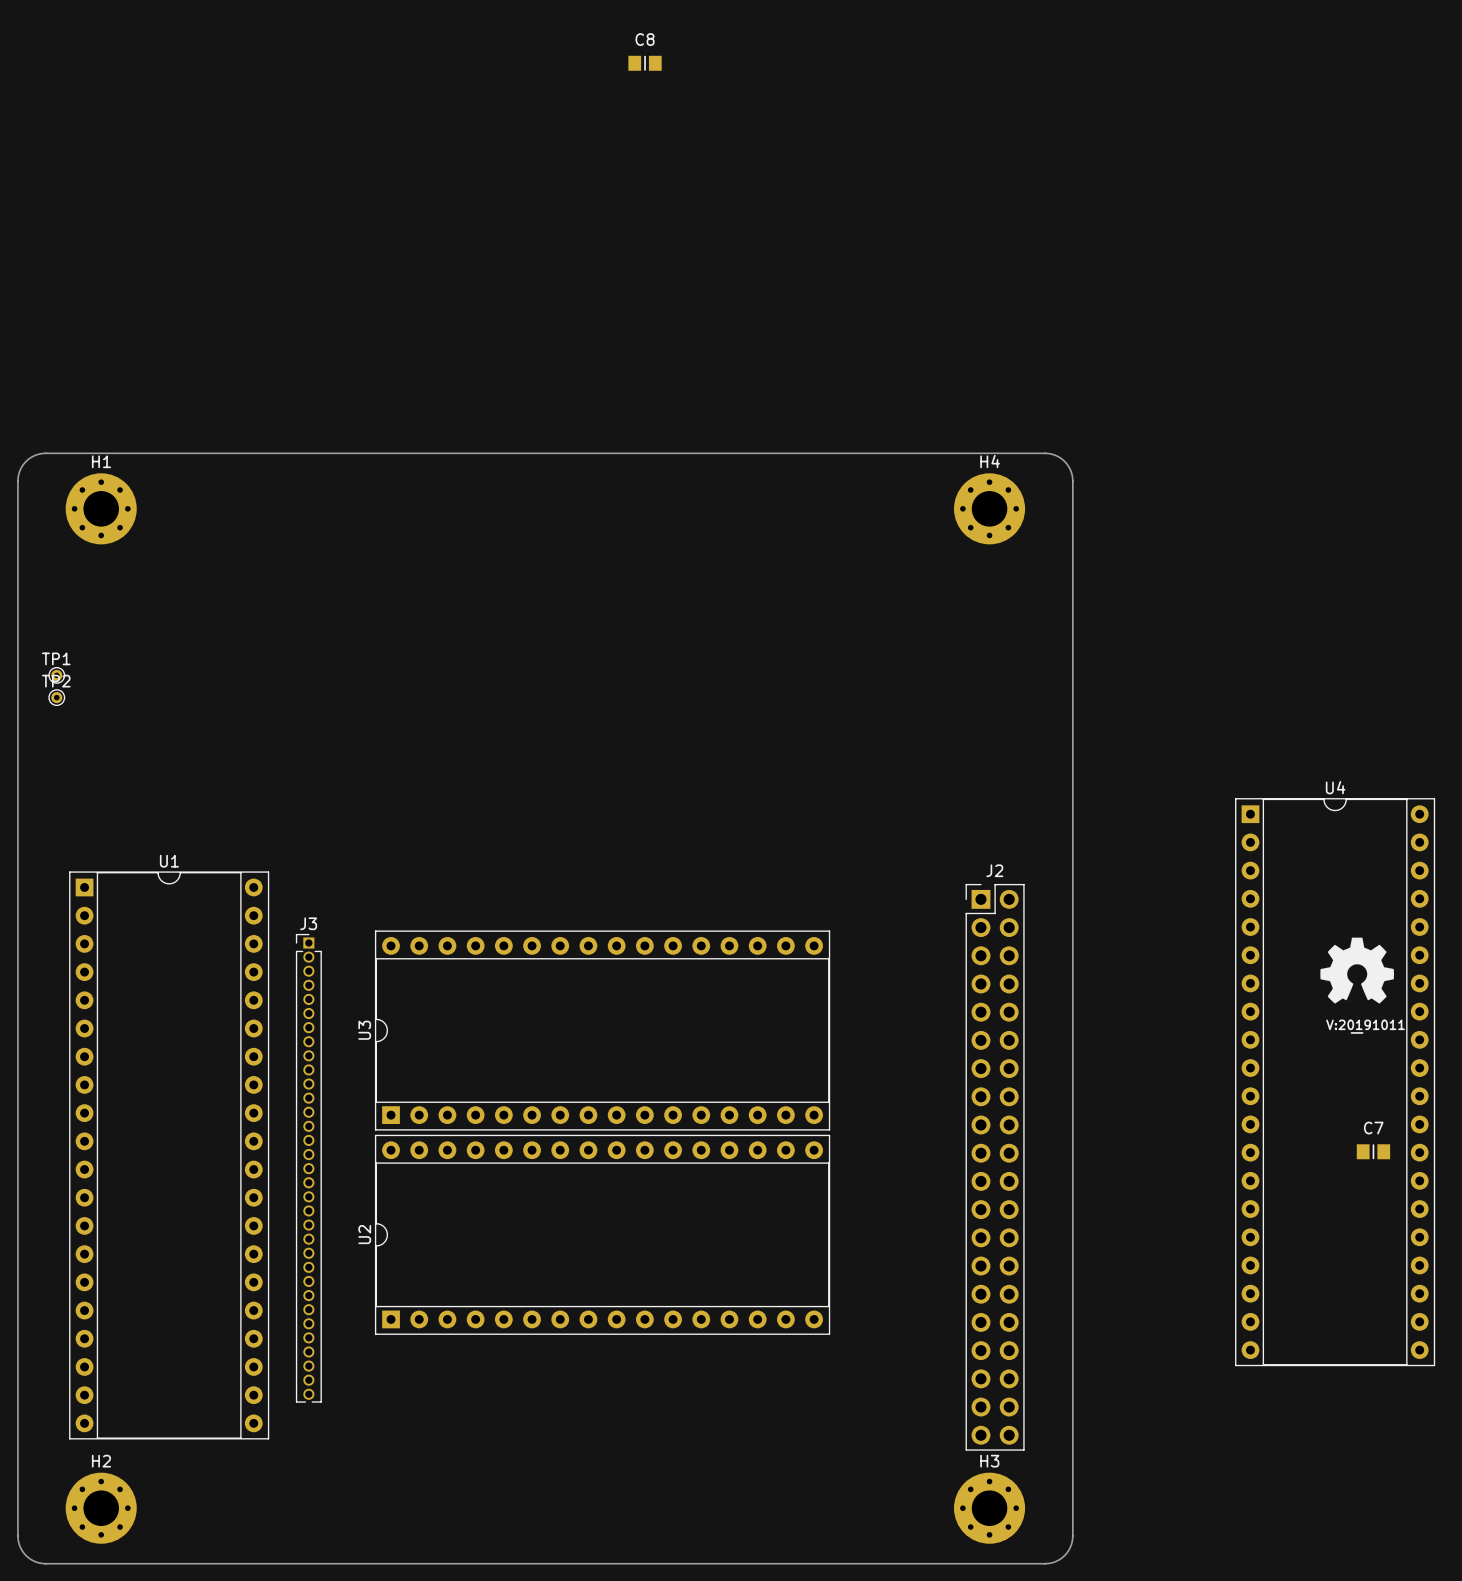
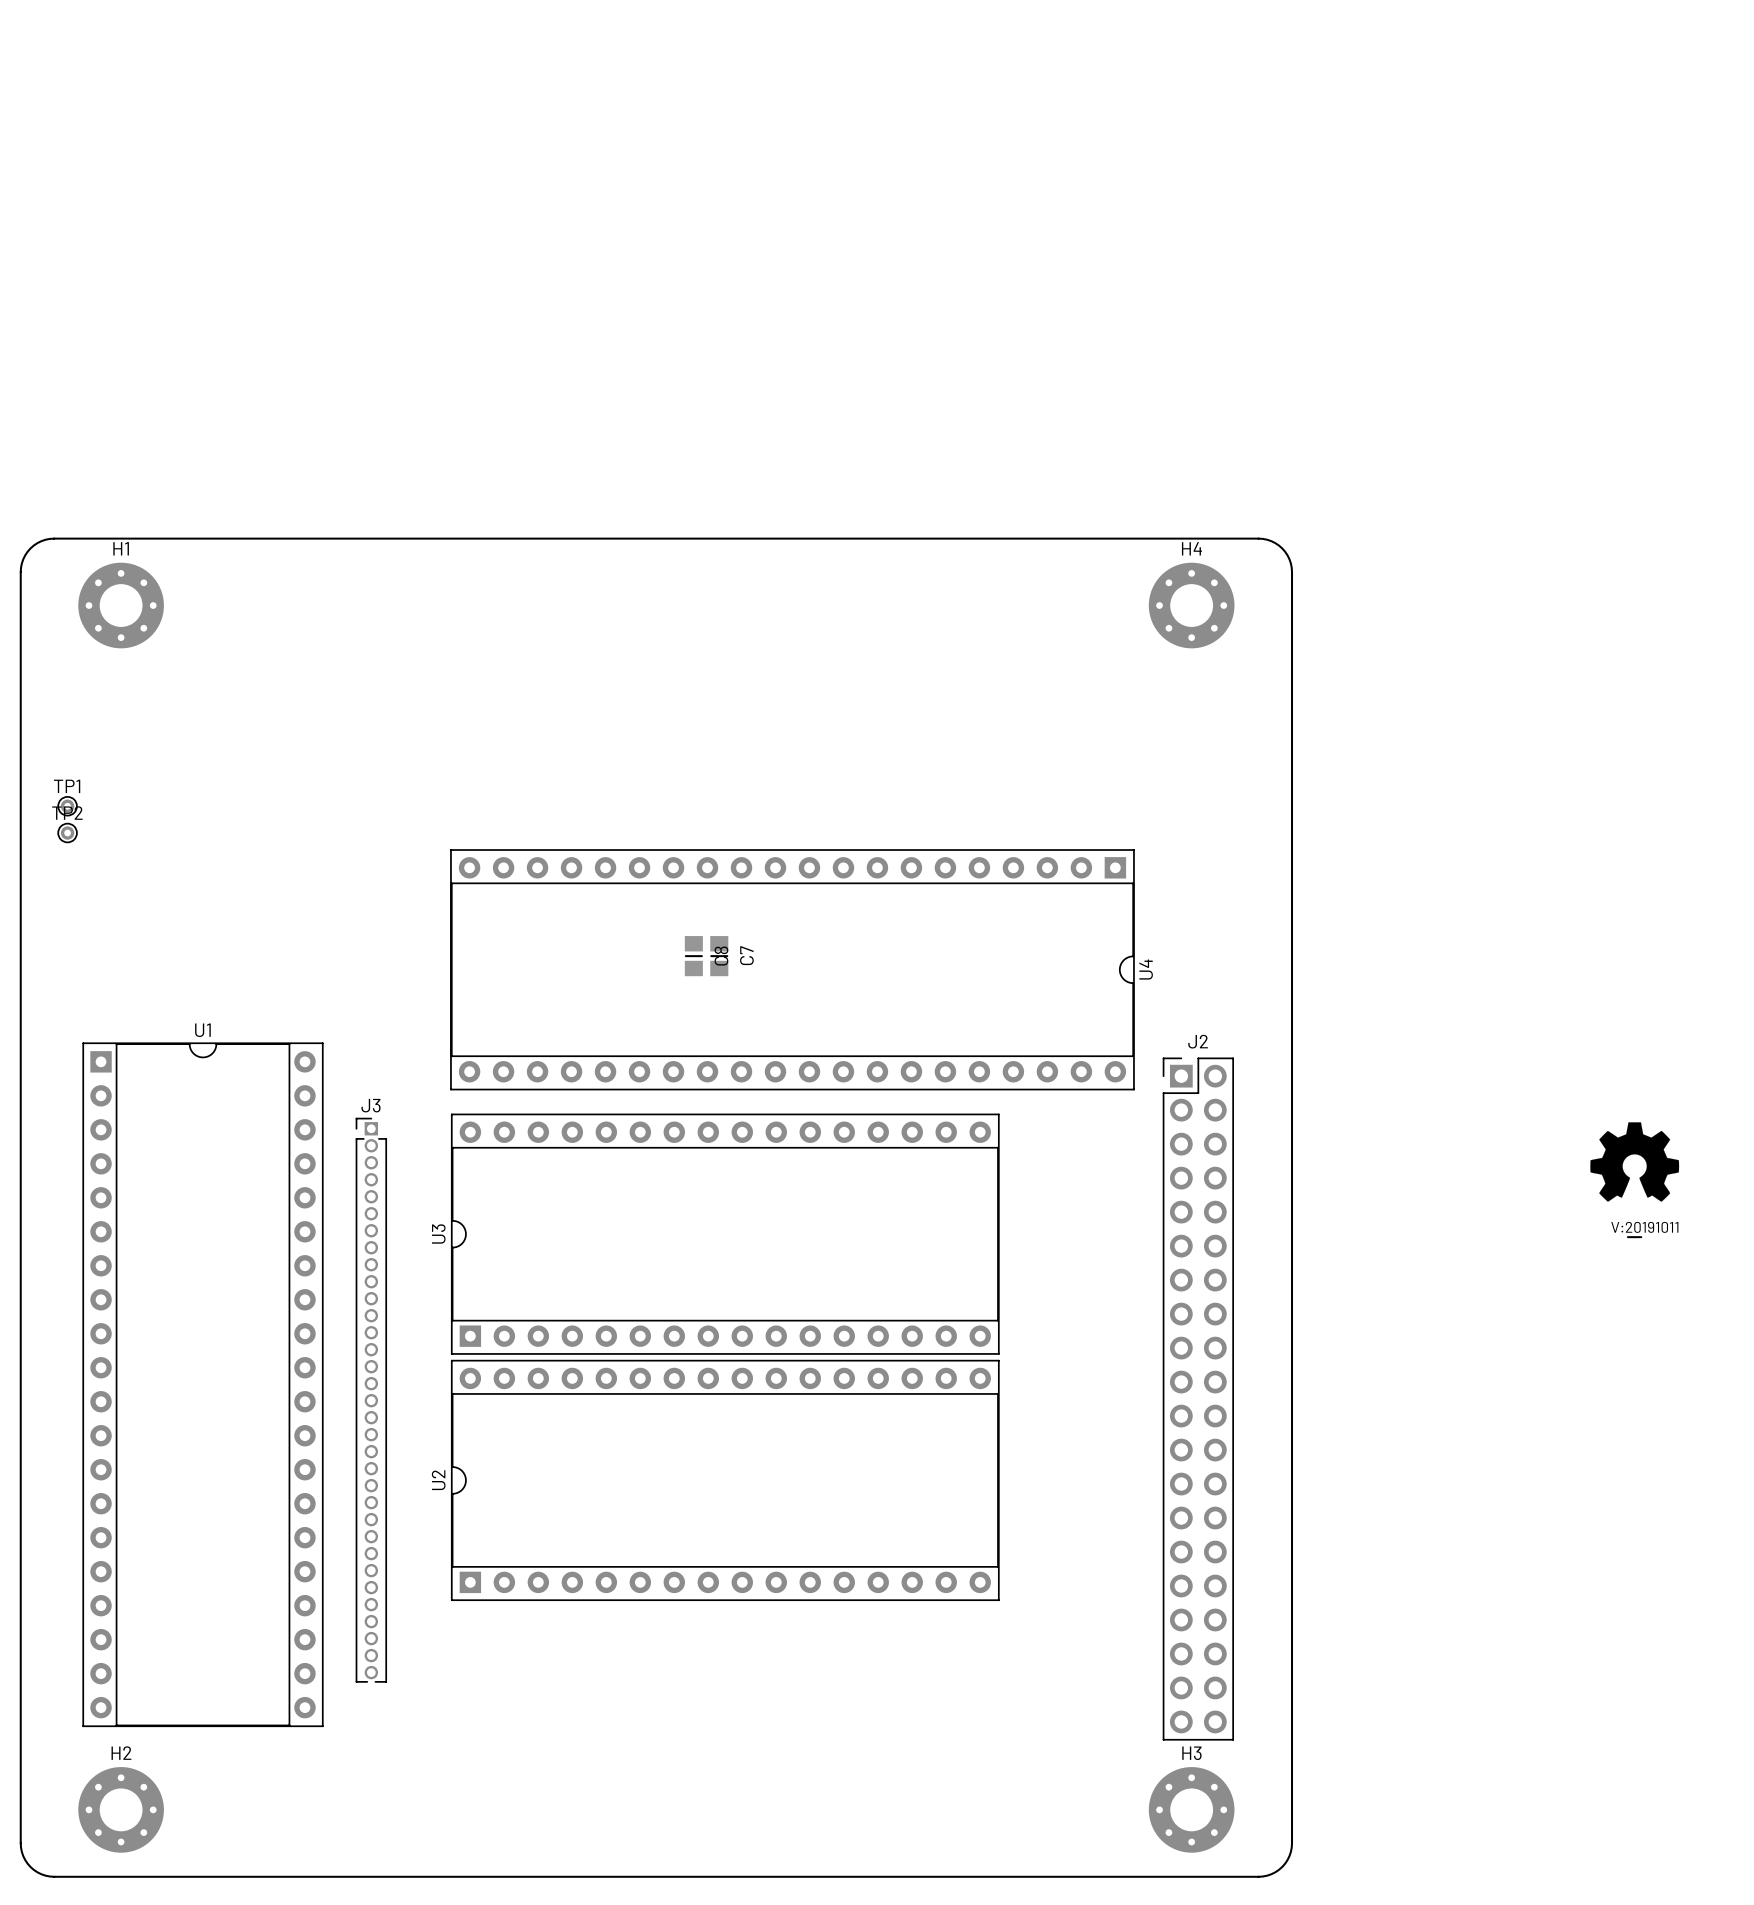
C8 rotation: 0° (645, 63) -> 90° clockwise (693, 956)
C8 position: (645, 63) -> (693, 956)
U4 rotation: 0° (1335, 1082) -> 90° clockwise (792, 969)
U4 position: (1335, 1082) -> (792, 969)
C7 rotation: 0° (1373, 1151) -> 90° clockwise (719, 956)
C7 position: (1373, 1151) -> (719, 956)

